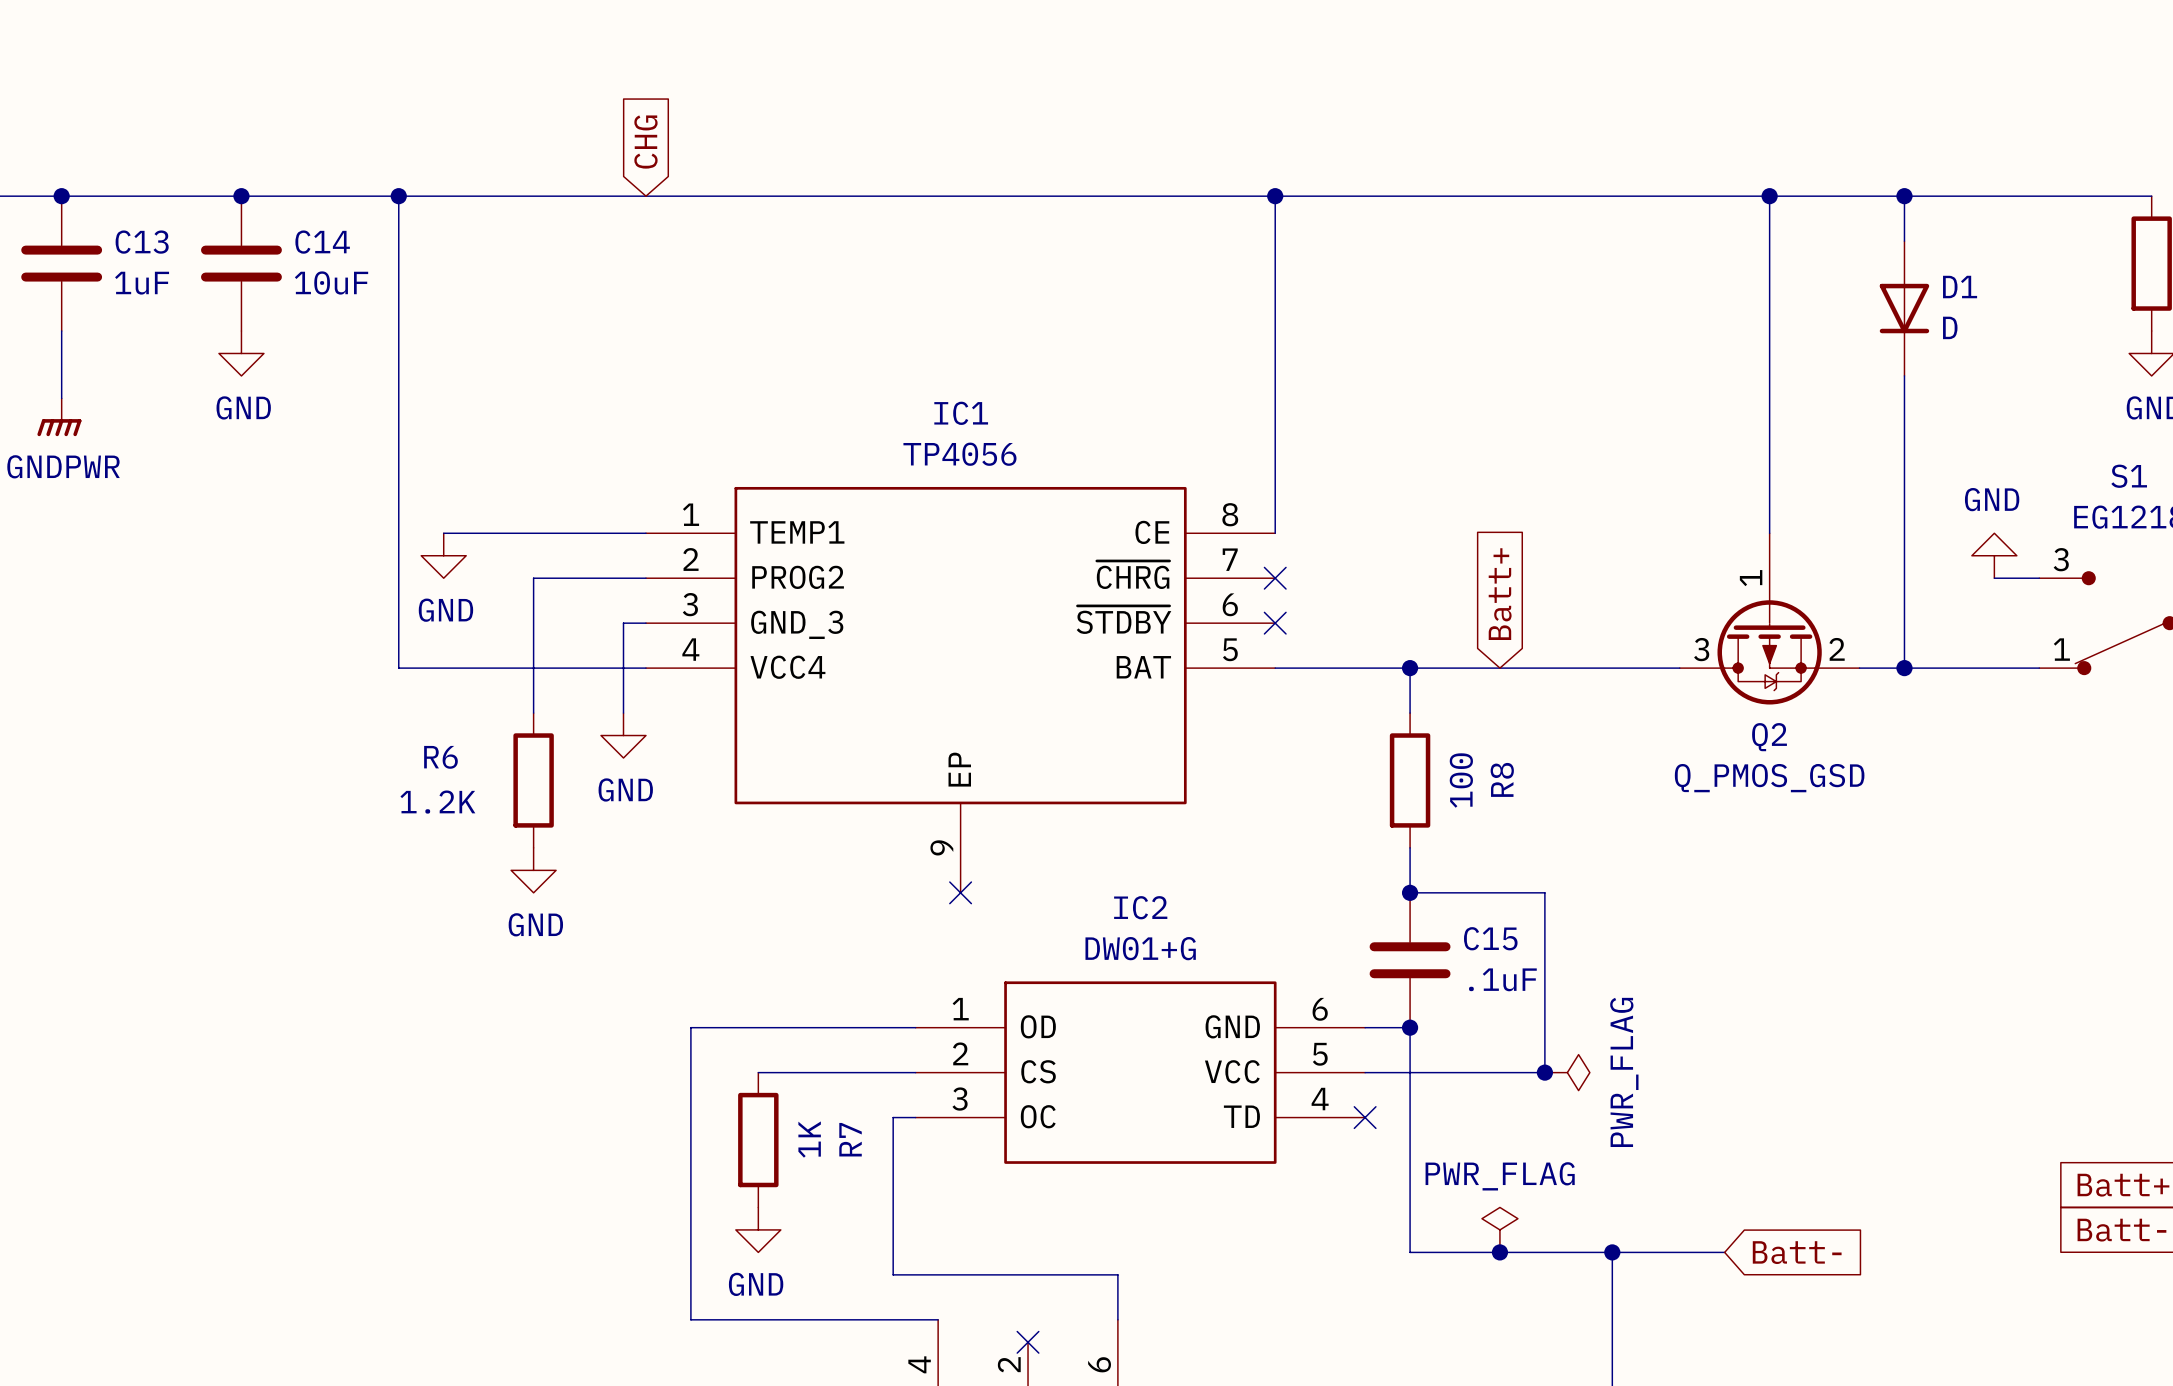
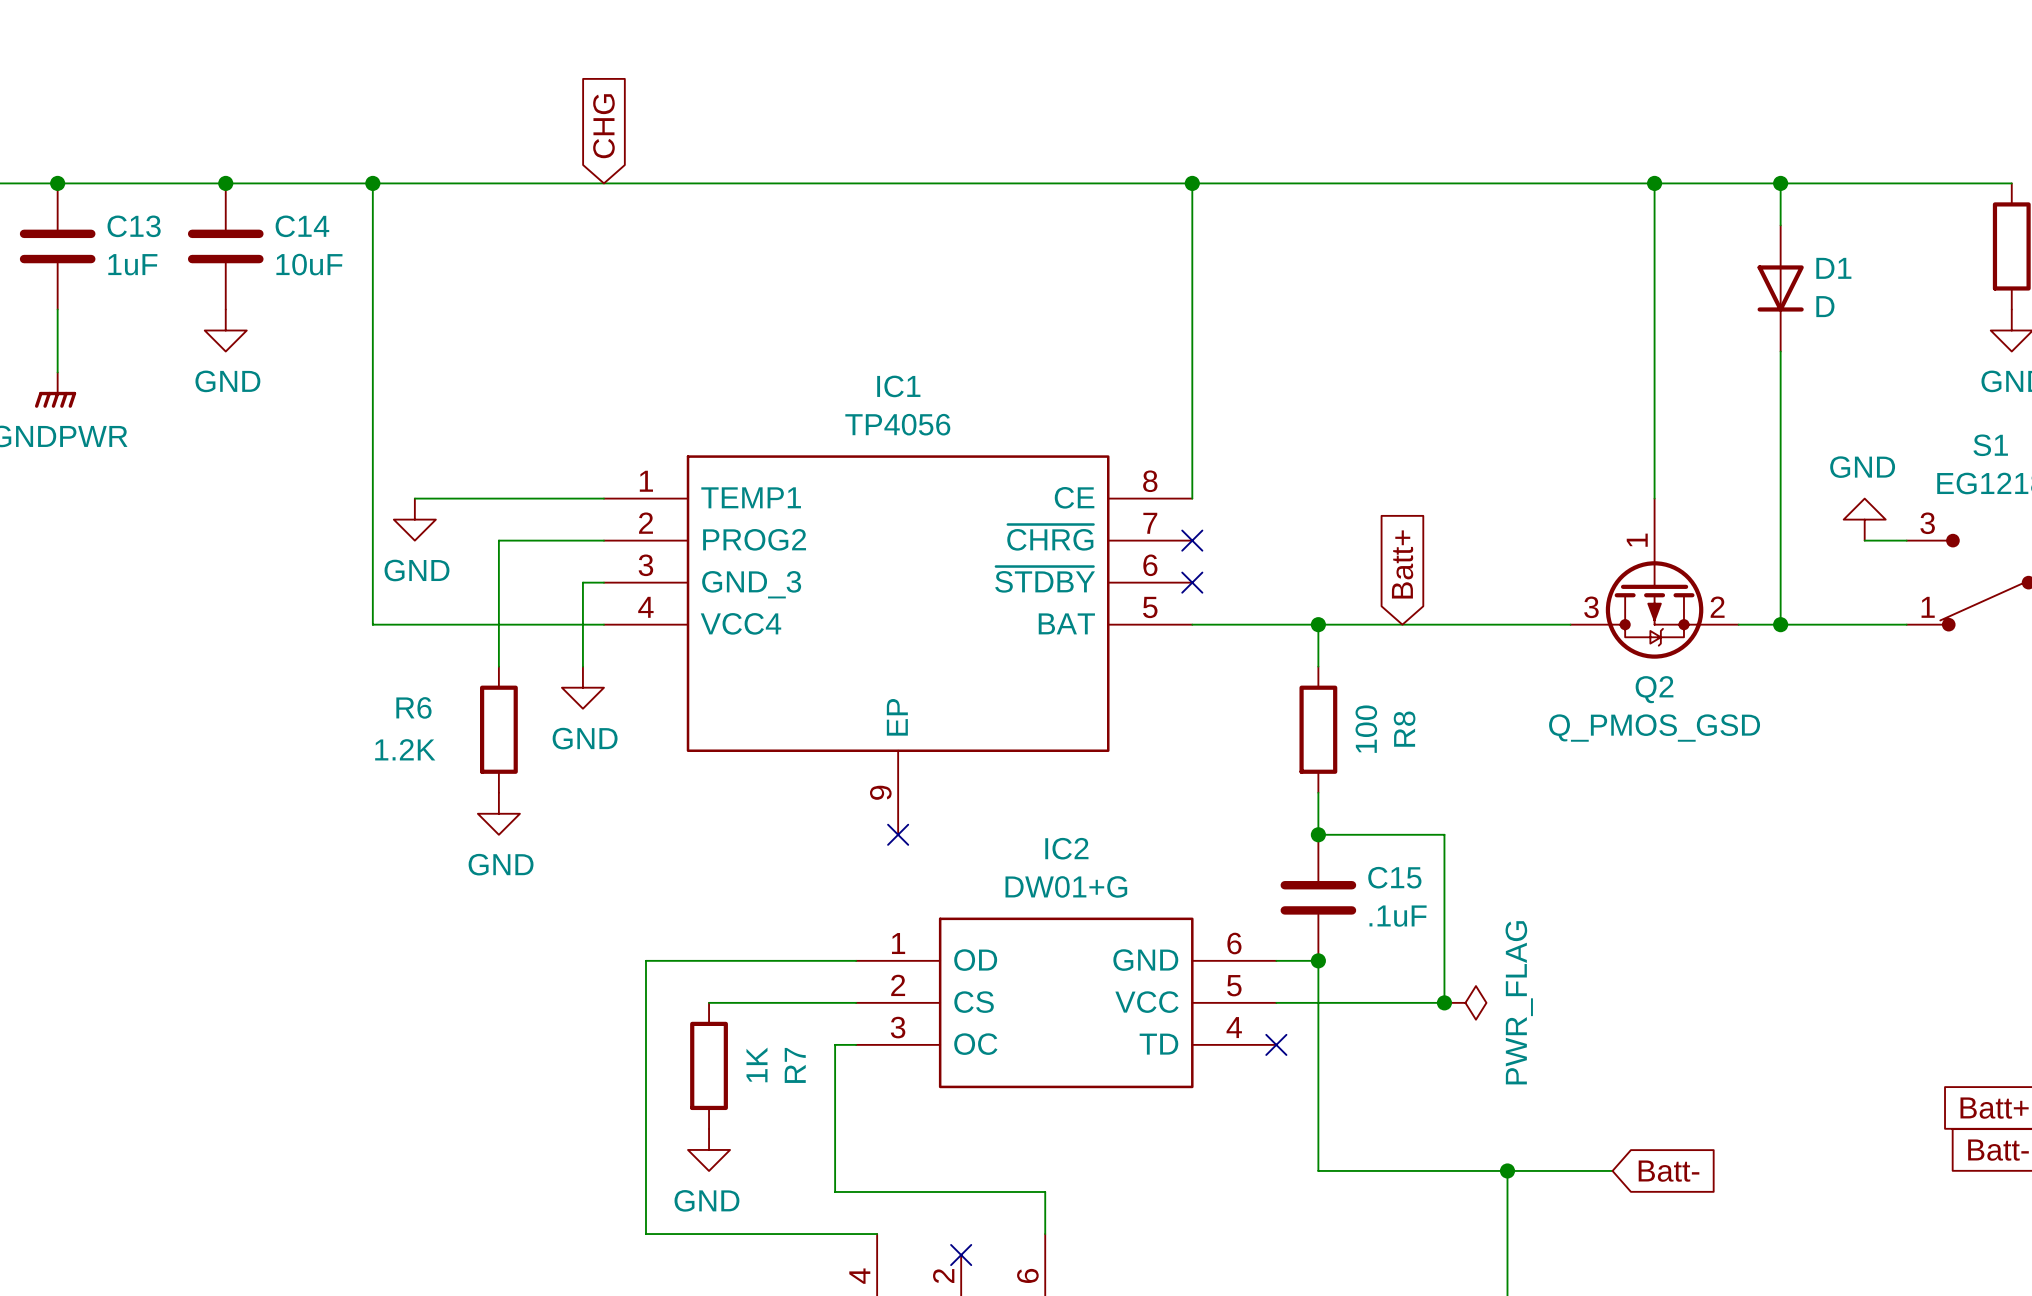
power symbol: PWR_FLAG (1499, 1229) -> none
junction: (1499, 1252) -> none

